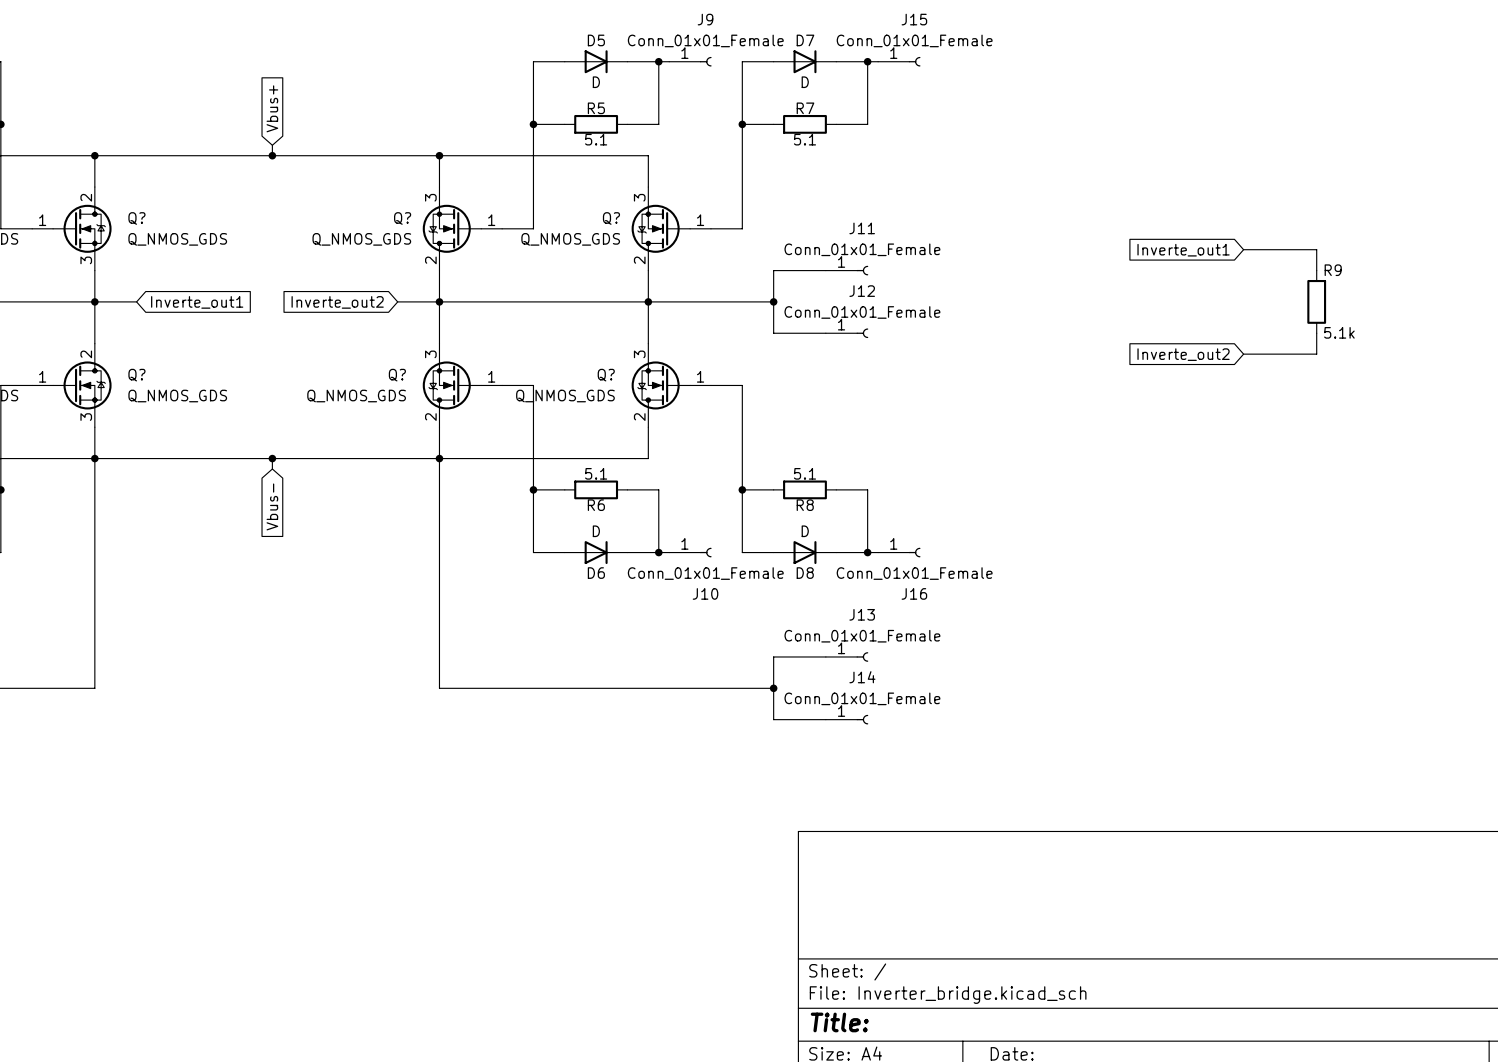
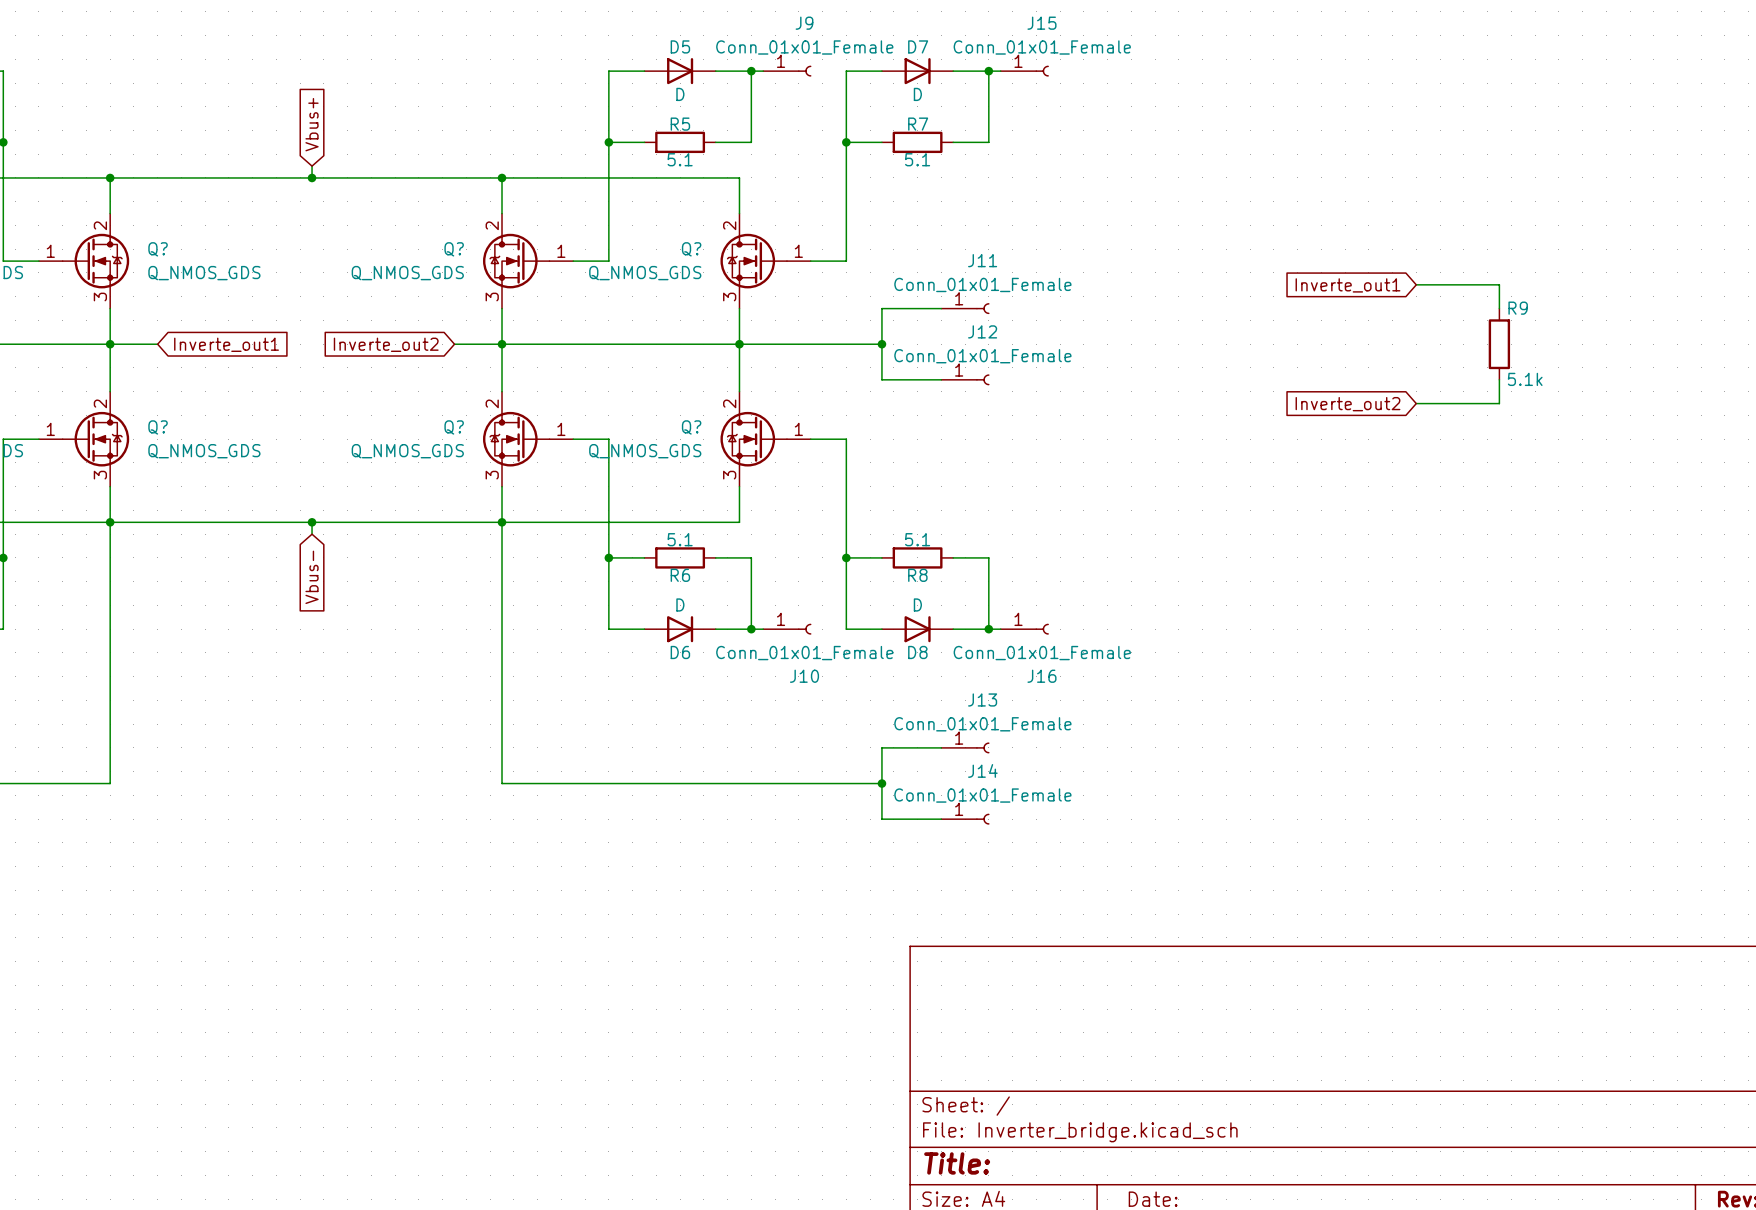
Q? flip: as is (452, 228) -> up-down (516, 261)
Q? flip: as is (660, 228) -> up-down (753, 261)
Q? flip: as is (452, 385) -> up-down (516, 439)
Q? flip: as is (660, 385) -> up-down (753, 439)

